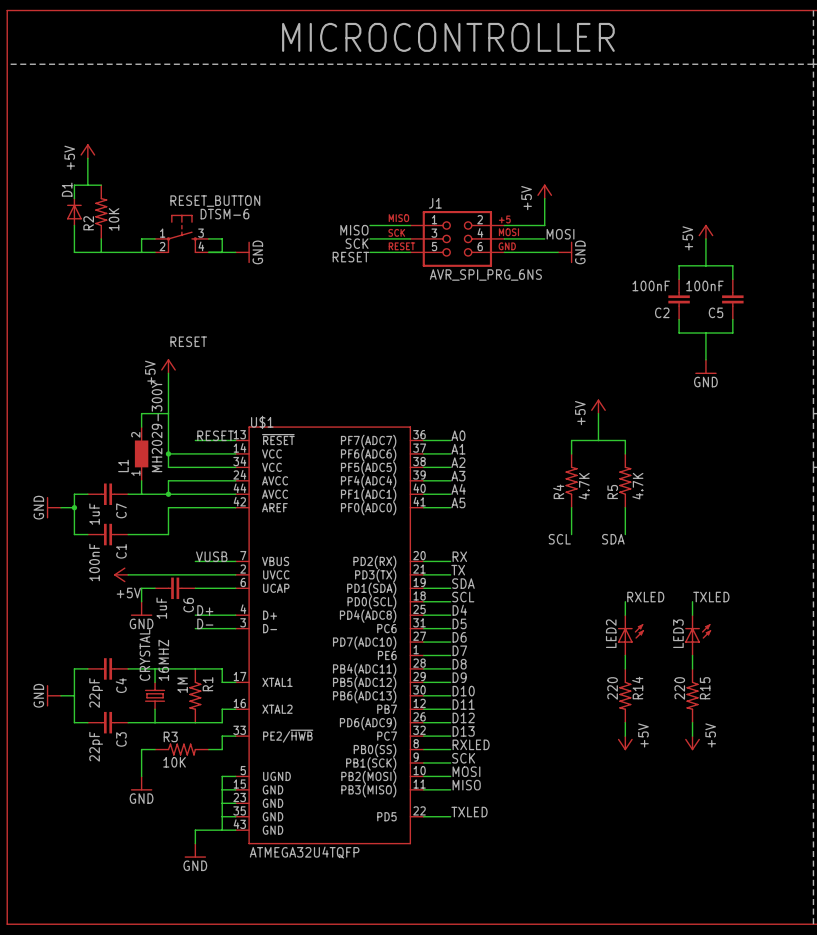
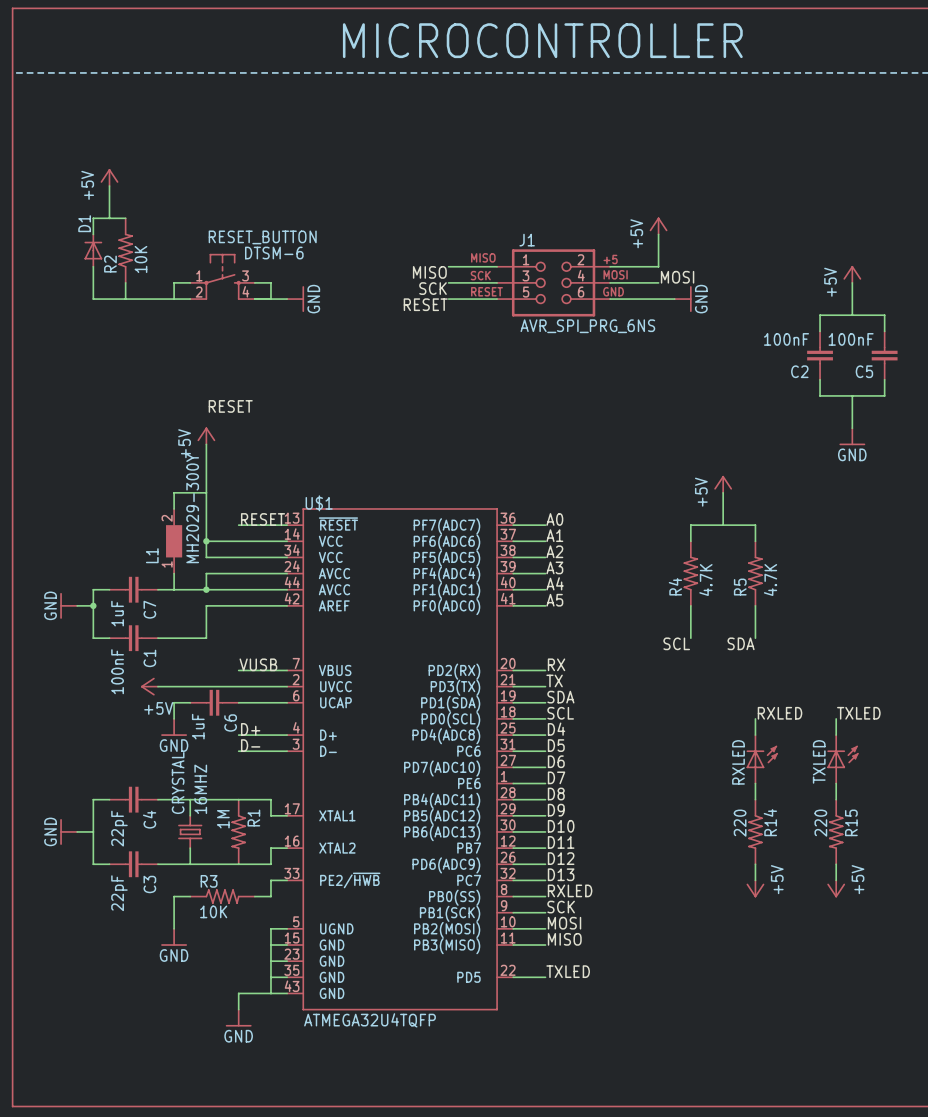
LED2 name: LED2 (611, 633) -> RXLED (738, 762)
LED3 name: LED3 (678, 633) -> TXLED (819, 761)

